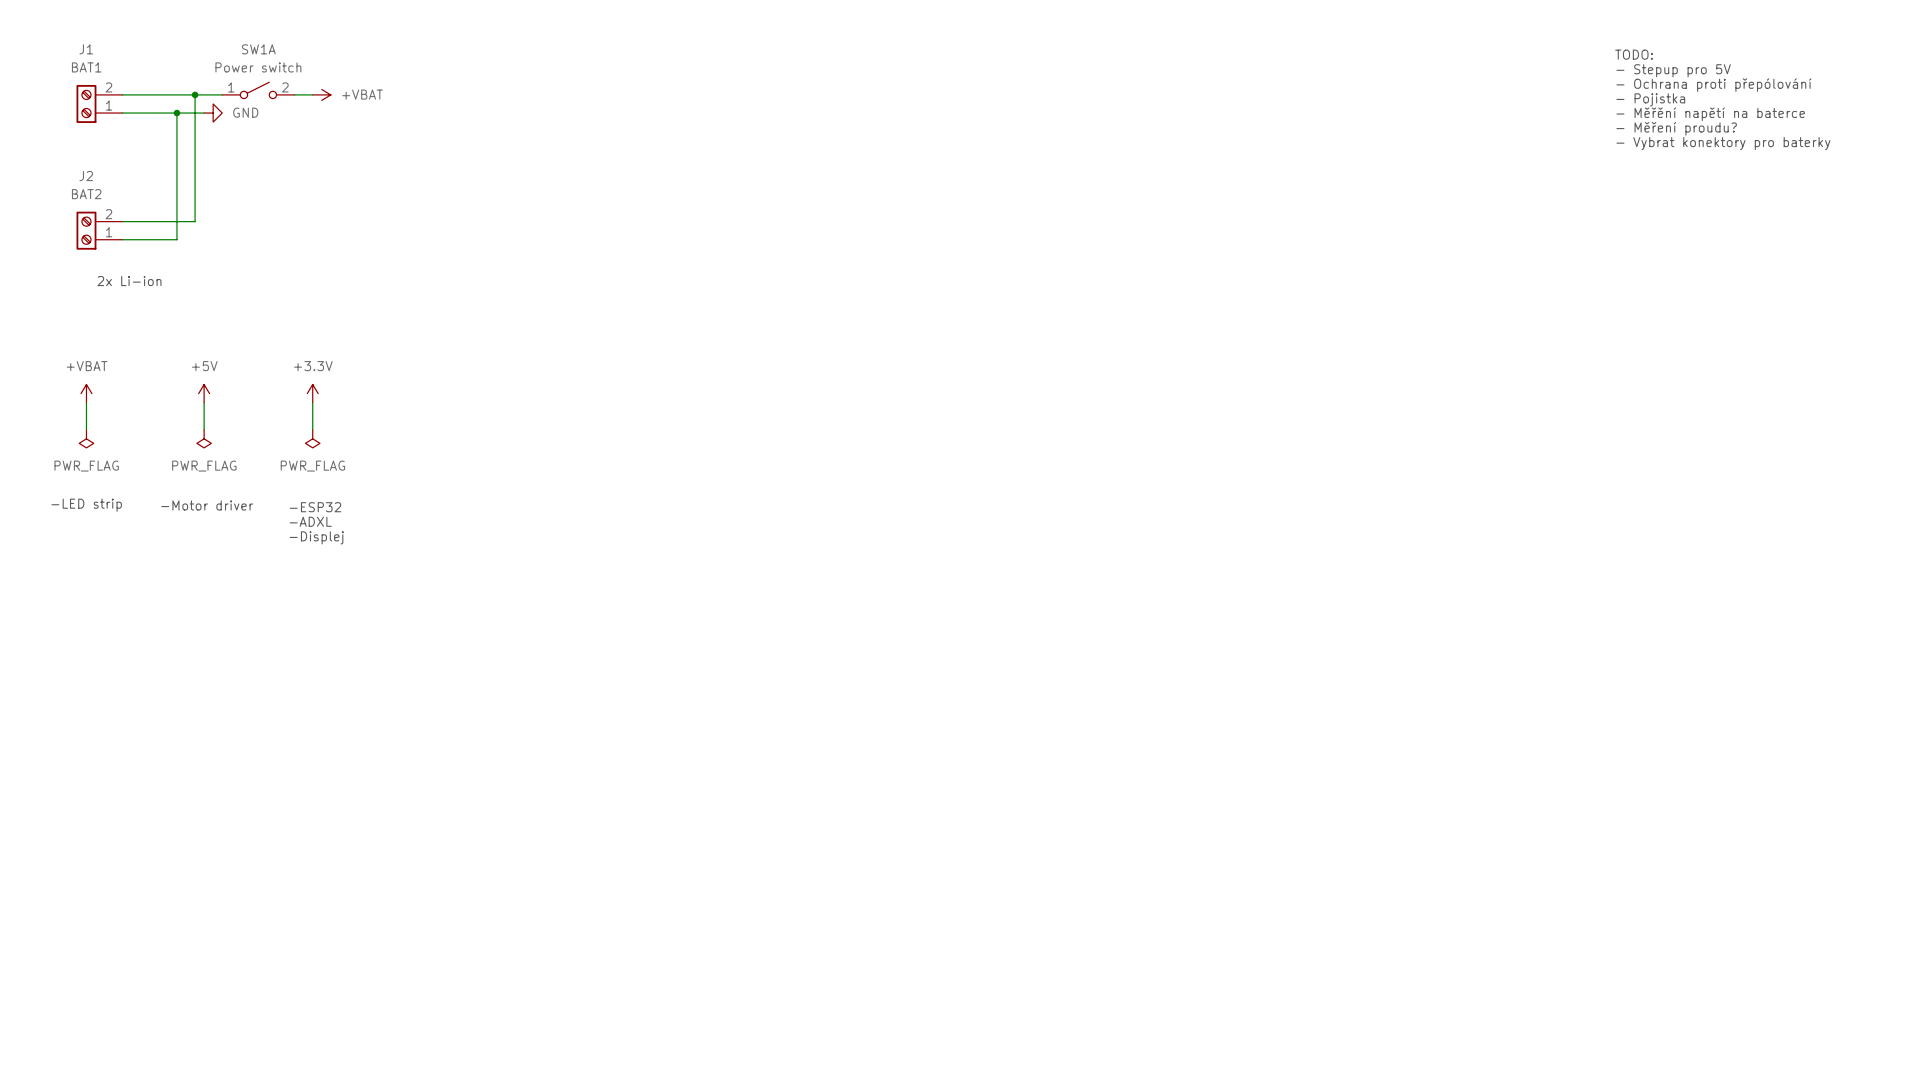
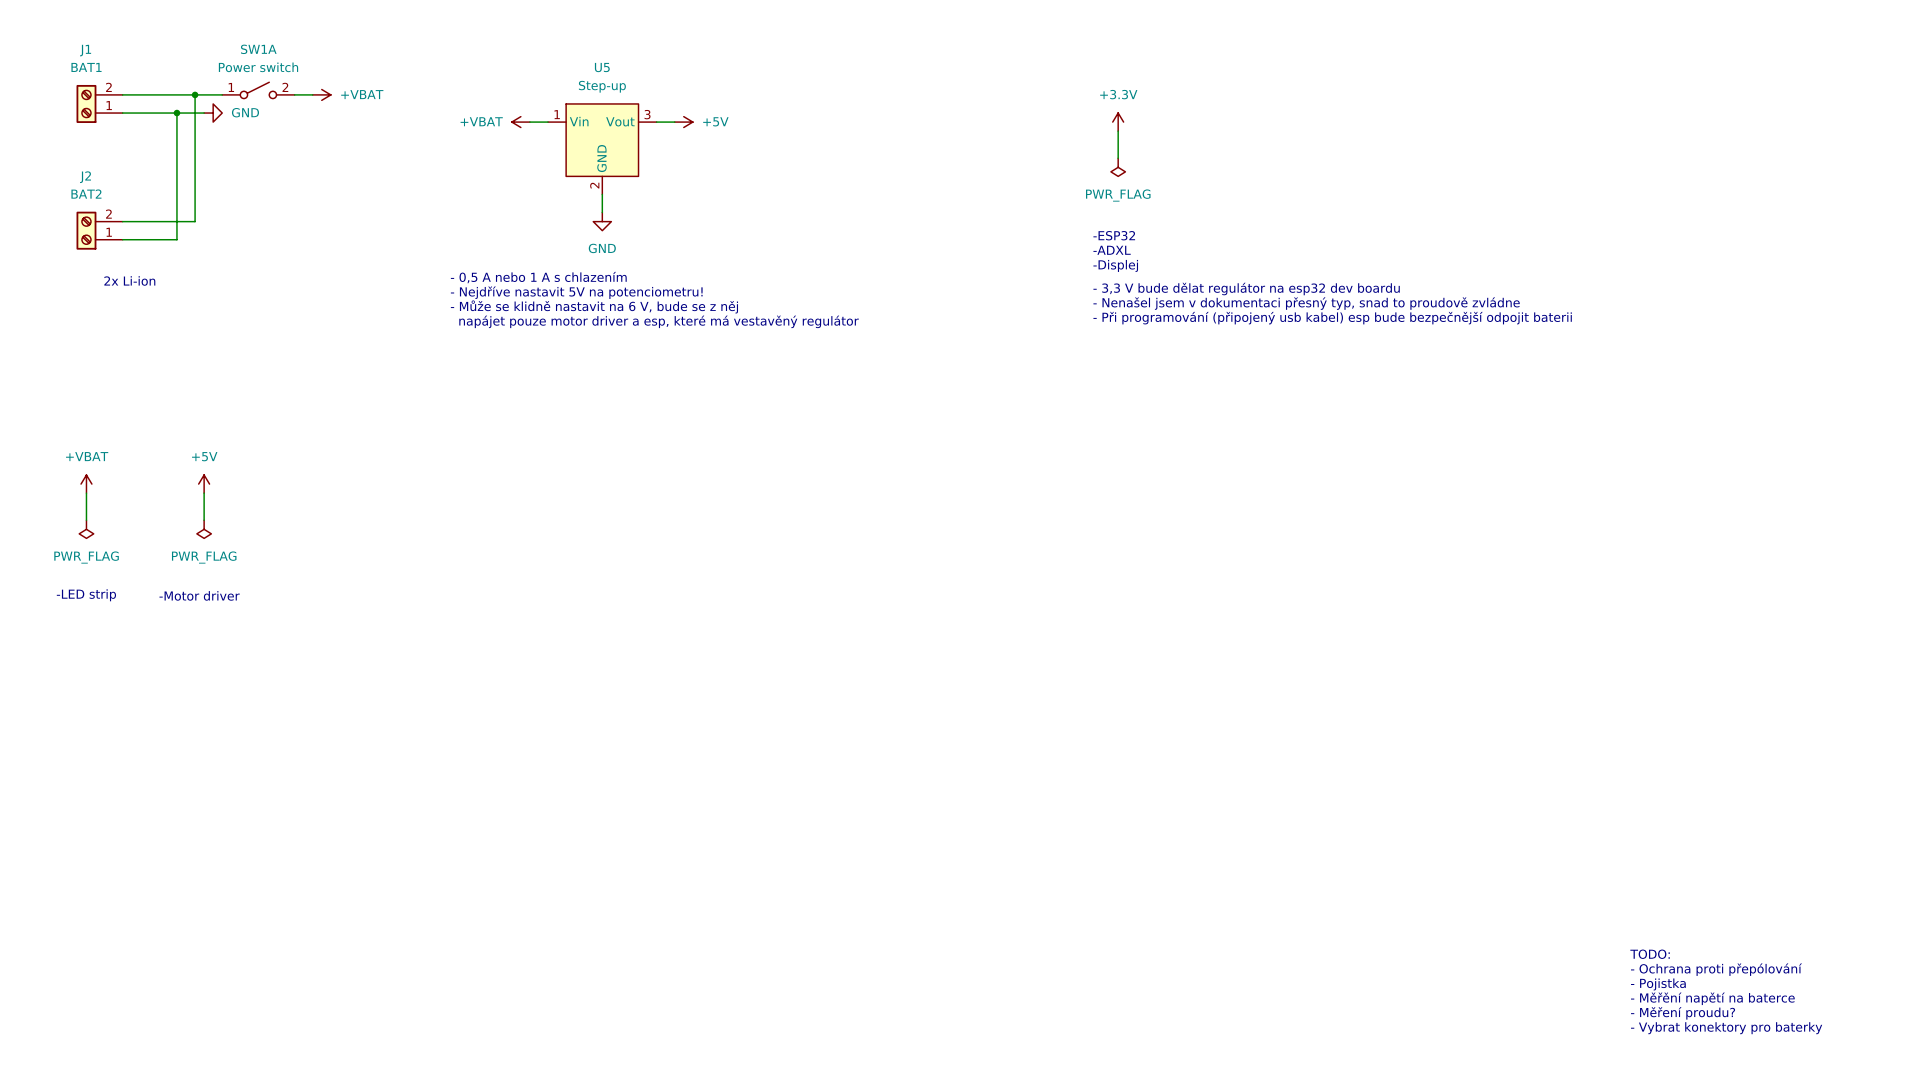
text: TODO: (1634, 54) -> none
text: - Stepup pro 5V (1673, 70) -> none
text: - Ochrana proti přepólování (1713, 85) -> none
text: - Pojistka (1650, 99) -> none
text: - Měřění napětí na baterce (1710, 114) -> none
power symbol: none -> +VBAT (520, 122)
wire: none -> (529, 122) (548, 122)
wire: none -> (656, 122) (674, 122)
power symbol: none -> +5V (683, 122)
power symbol: none -> +3.3V (1118, 122)
text: - Měření proudu? (1676, 128) -> none
wire: none -> (1118, 131) (1118, 158)
text: - Vybrat konektory pro baterky (1723, 143) -> none
U5: none -> Step-up (602, 149)
power symbol: none -> PWR_FLAG (1118, 167)
wire: none -> (602, 194) (602, 212)
power symbol: none -> GND (602, 221)
text: none -> -ESP32 (1114, 235)
text: none -> -ADXL (1112, 250)
text: none -> -Displej (1115, 265)
text: none -> - 0,5 A nebo 1 A s chlazením (538, 277)
text: none -> - 3,3 V bude dělat regulátor na esp32 dev boardu (1246, 289)
text: none -> - Nejdříve nastavit 5V na potenciometru! (576, 292)
text: none -> - Nenašel jsem v dokumentaci přesný typ, snad to proudově zvládne (1306, 303)
text: none -> - Může se klidně nastavit na 6 V, bude se z něj (594, 306)
text: none -> - Při programování (připojený usb kabel) esp bude bezpečnější odpojit baterii (1332, 318)
text: none -> napájet pouze motor driver a esp, které má vestavěný regulátor (659, 321)
power symbol position: +VBAT (86, 393) -> +VBAT (86, 484)
power symbol position: +5V (204, 393) -> +5V (204, 484)
power symbol: +3.3V (312, 393) -> none
wire: (86, 402) (86, 429) -> (86, 493) (86, 520)
wire: (204, 402) (204, 429) -> (204, 493) (204, 520)
wire: (312, 402) (312, 429) -> none
power symbol: PWR_FLAG (86, 438) -> none
power symbol: PWR_FLAG (204, 438) -> none
power symbol: PWR_FLAG (312, 438) -> none
text position: -LED strip (86, 505) -> -LED strip (86, 595)
text position: -Motor driver (207, 505) -> -Motor driver (199, 595)
text: -ESP32 (315, 507) -> none
text: -ADXL (310, 521) -> none
power symbol: none -> PWR_FLAG (86, 529)
power symbol: none -> PWR_FLAG (204, 529)
text: -Displej (316, 537) -> none
text: none -> TODO: (1650, 954)
text: none -> - Ochrana proti přepólování (1716, 969)
text: none -> - Pojistka (1658, 984)
text: none -> - Měřění napětí na baterce (1712, 998)
text: none -> - Měření proudu? (1683, 1013)
text: none -> - Vybrat konektory pro baterky (1726, 1028)

